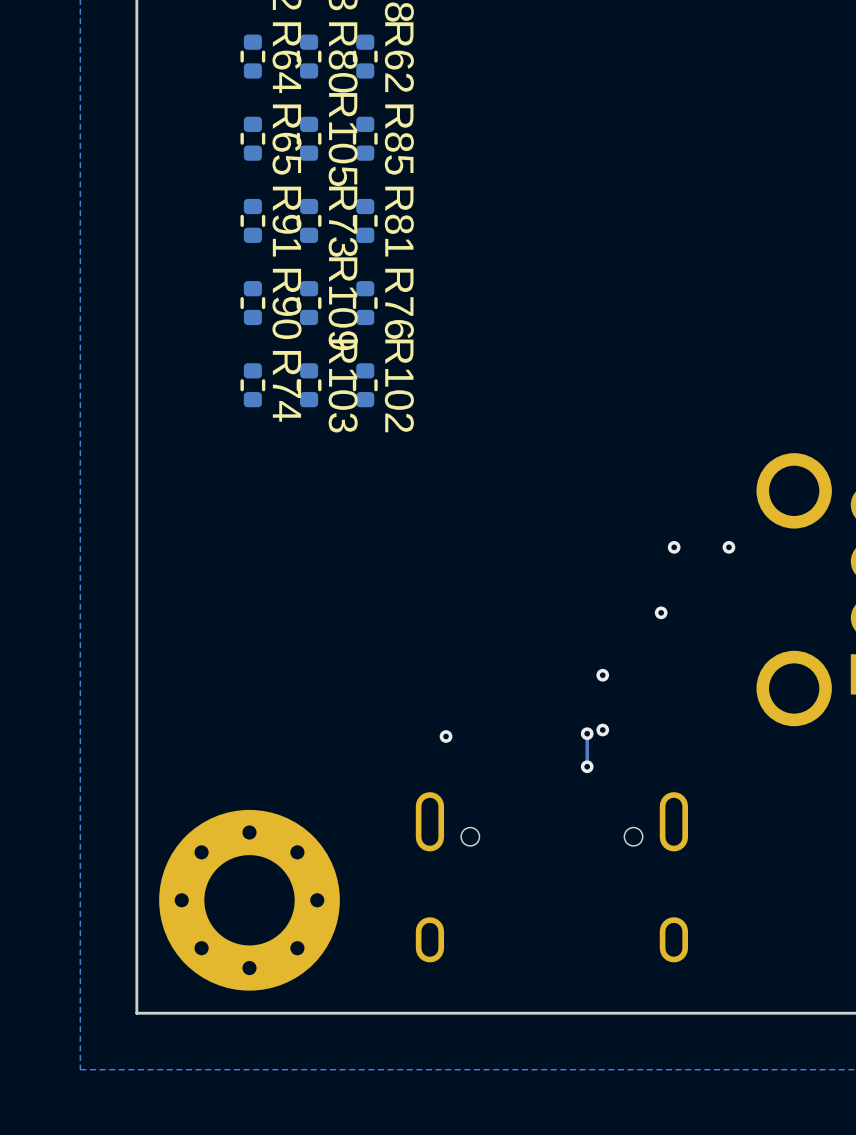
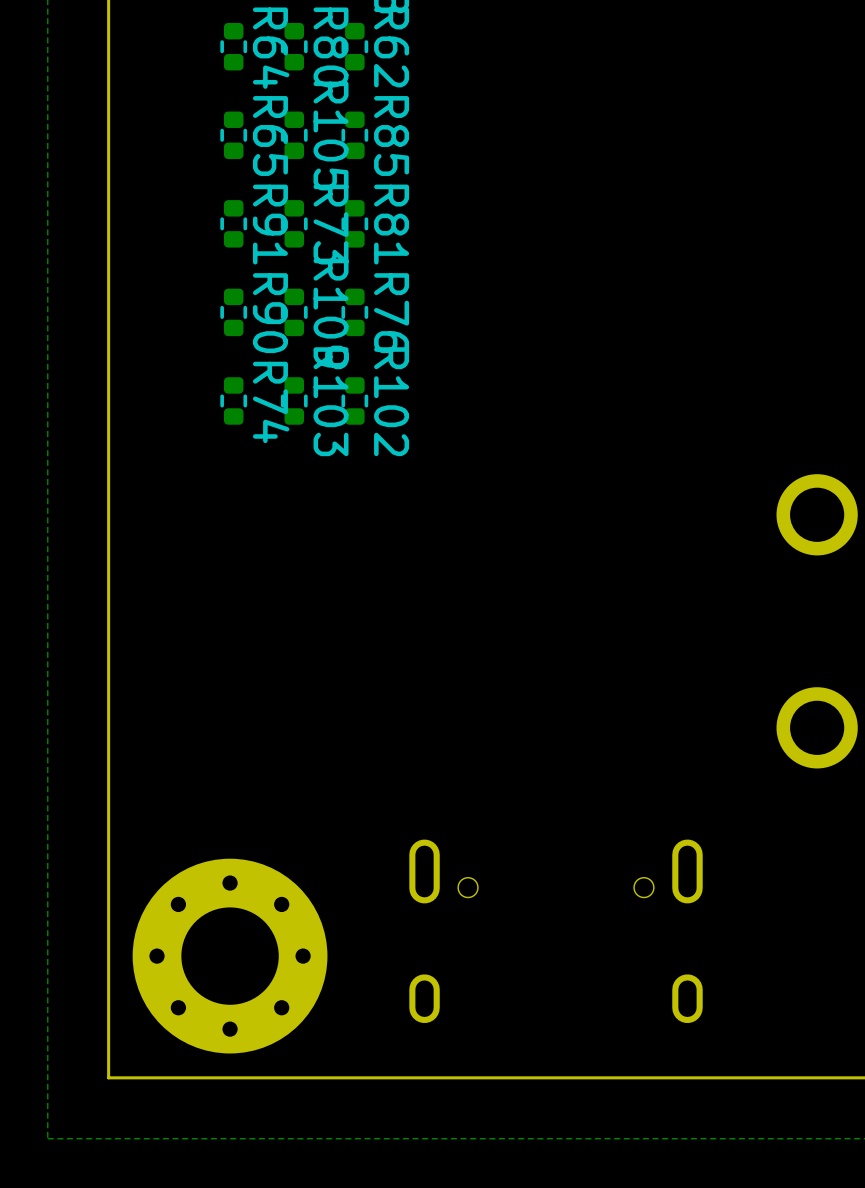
via: (674, 547) -> none
via: (728, 547) -> none
via: (661, 612) -> none
via: (602, 675) -> none
via: (602, 730) -> none
track: (587, 733) (587, 766) -> none
via: (587, 733) -> none
via: (446, 736) -> none
via: (587, 766) -> none

